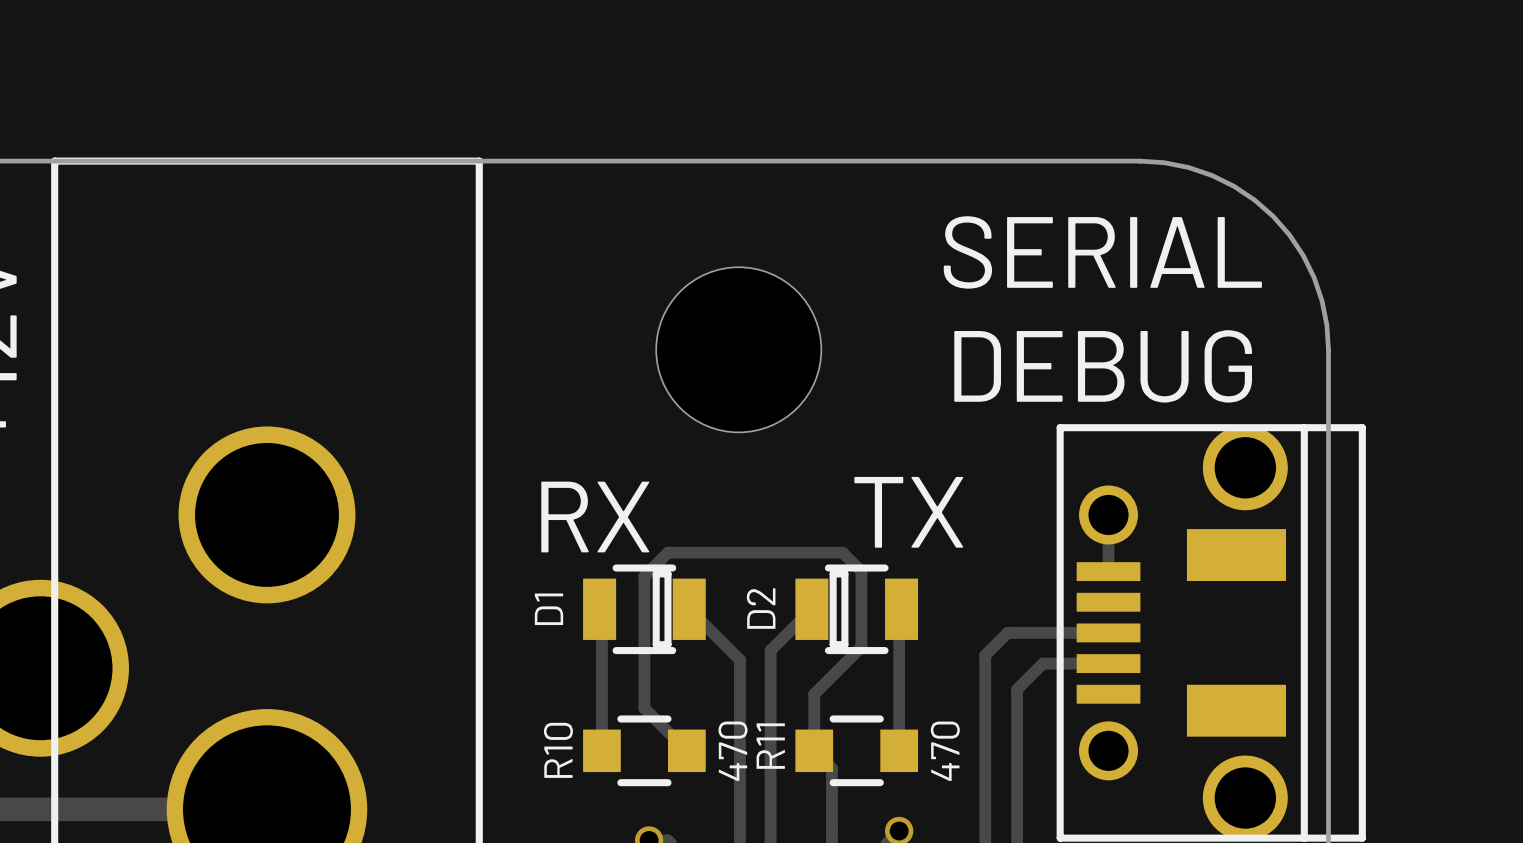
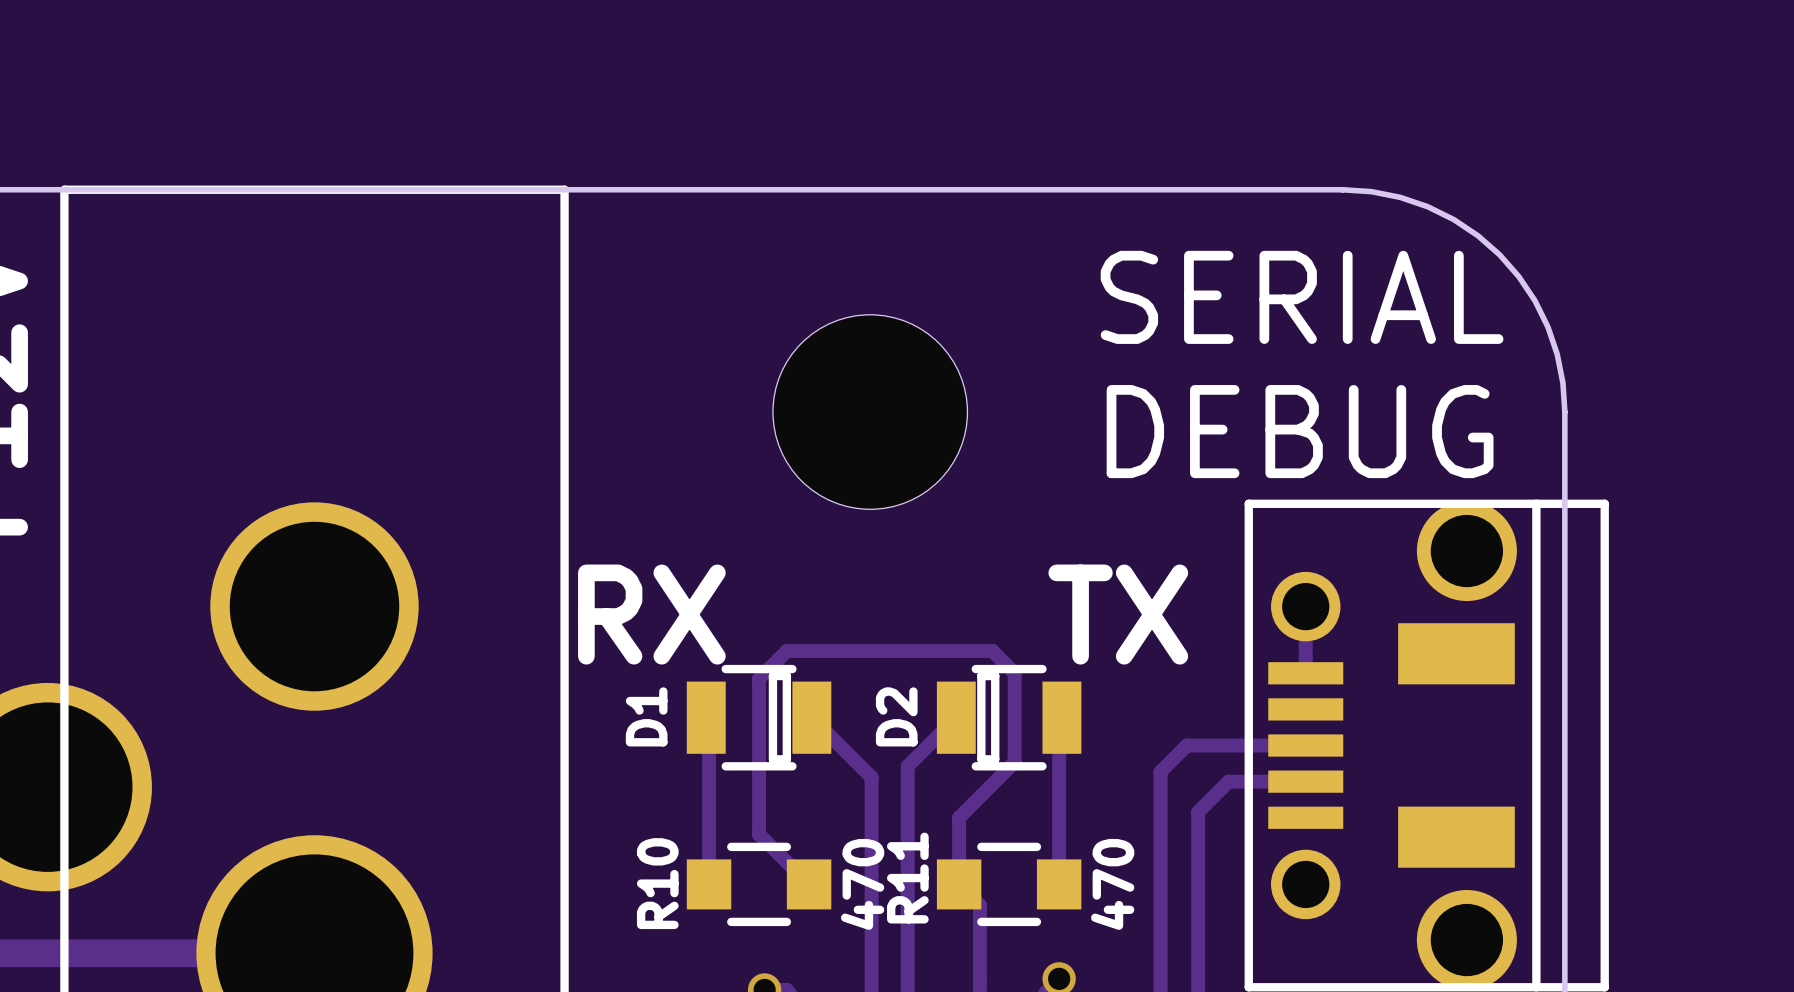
text position: TX (908, 512) -> TX (1118, 614)
text position: RX (595, 517) -> RX (651, 614)

